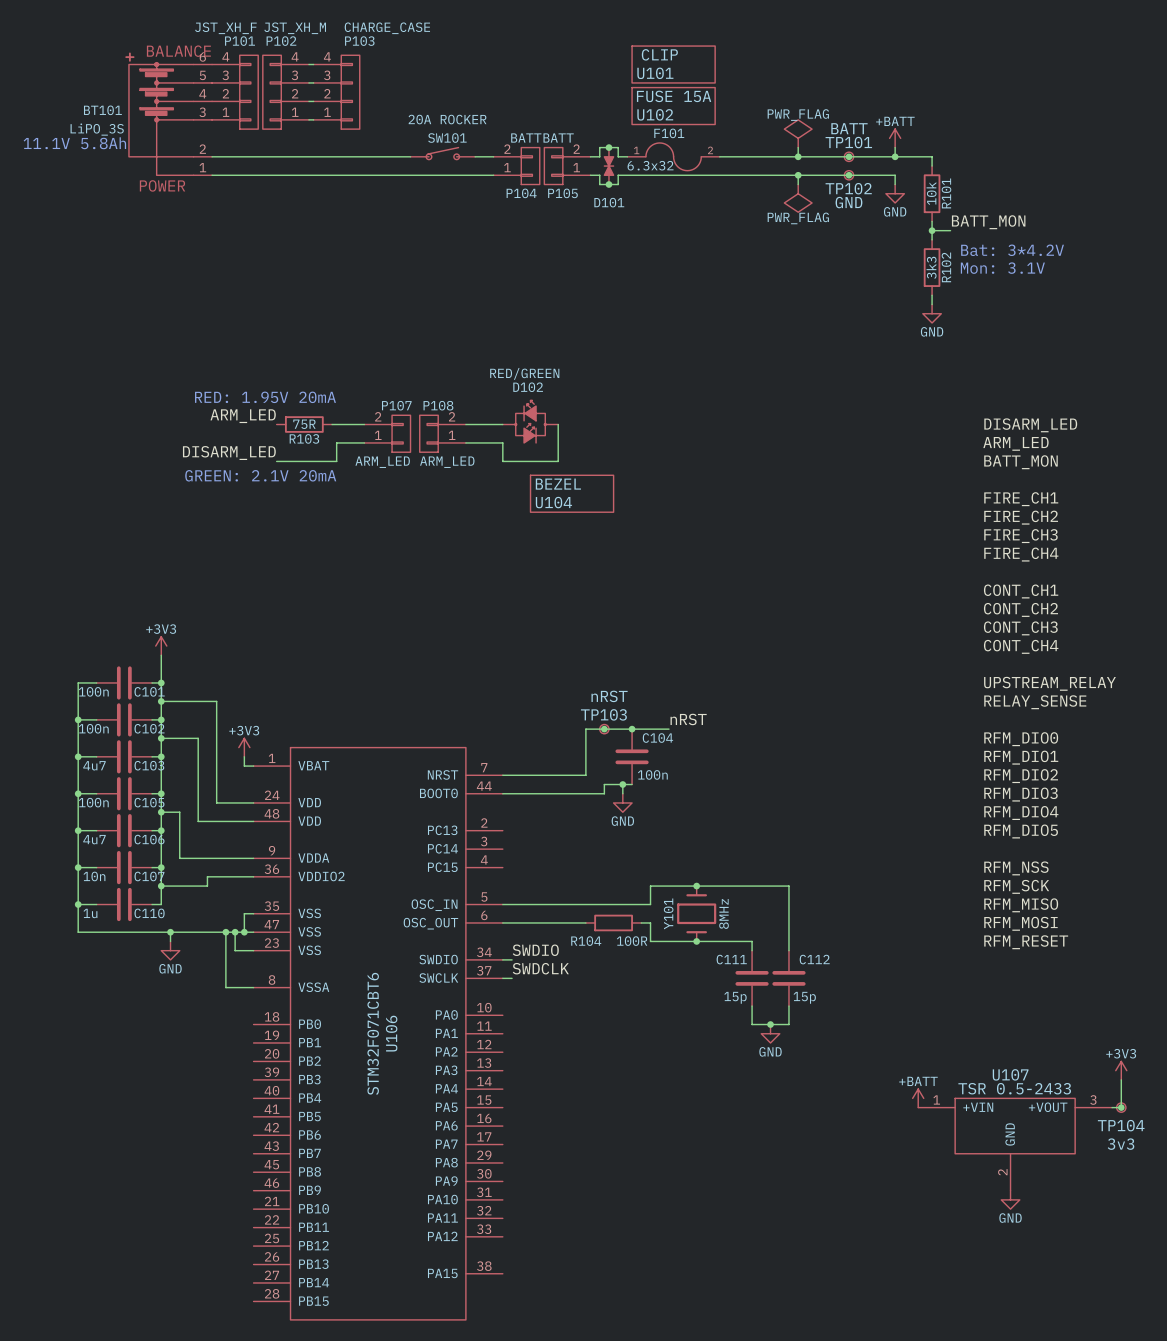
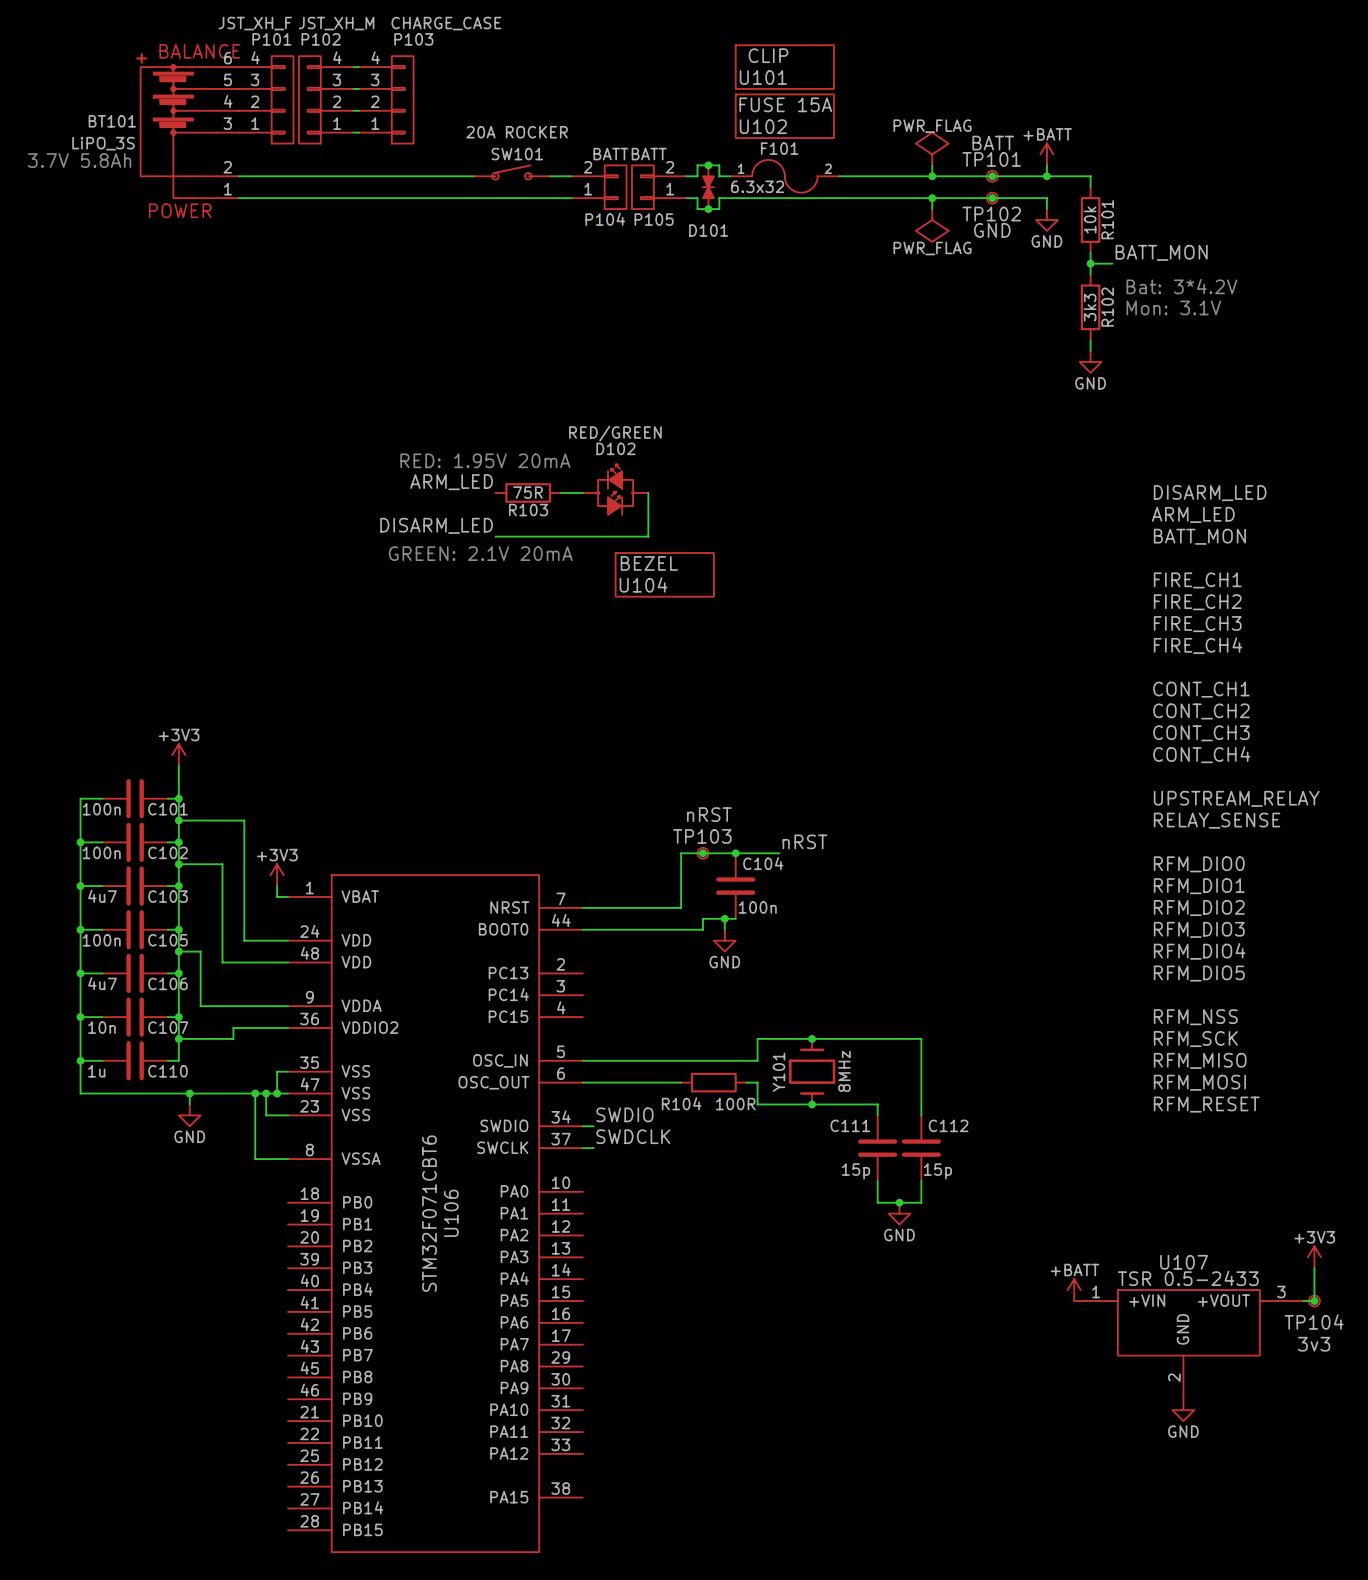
text: 11.1V 5.8Ah (74, 143) -> 3.7V 5.8Ah (79, 160)
text position: RED: 1.95V 20mA (265, 397) -> RED: 1.95V 20mA (485, 460)
label position: ARM_LED (243, 416) -> ARM_LED (451, 482)
R103 position: (304, 424) -> (528, 492)
wire: (332, 424) (364, 424) -> none
P107: ARM_LED (387, 433) -> none
P108: ARM_LED (442, 433) -> none
wire: (364, 442) (336, 442) (336, 461) (276, 461) -> none
wire: (465, 442) (502, 442) (502, 461) -> (495, 536) (582, 536)
label position: DISARM_LED (229, 453) -> DISARM_LED (436, 525)
text position: GREEN: 2.1V 20mA (260, 475) -> GREEN: 2.1V 20mA (480, 553)

